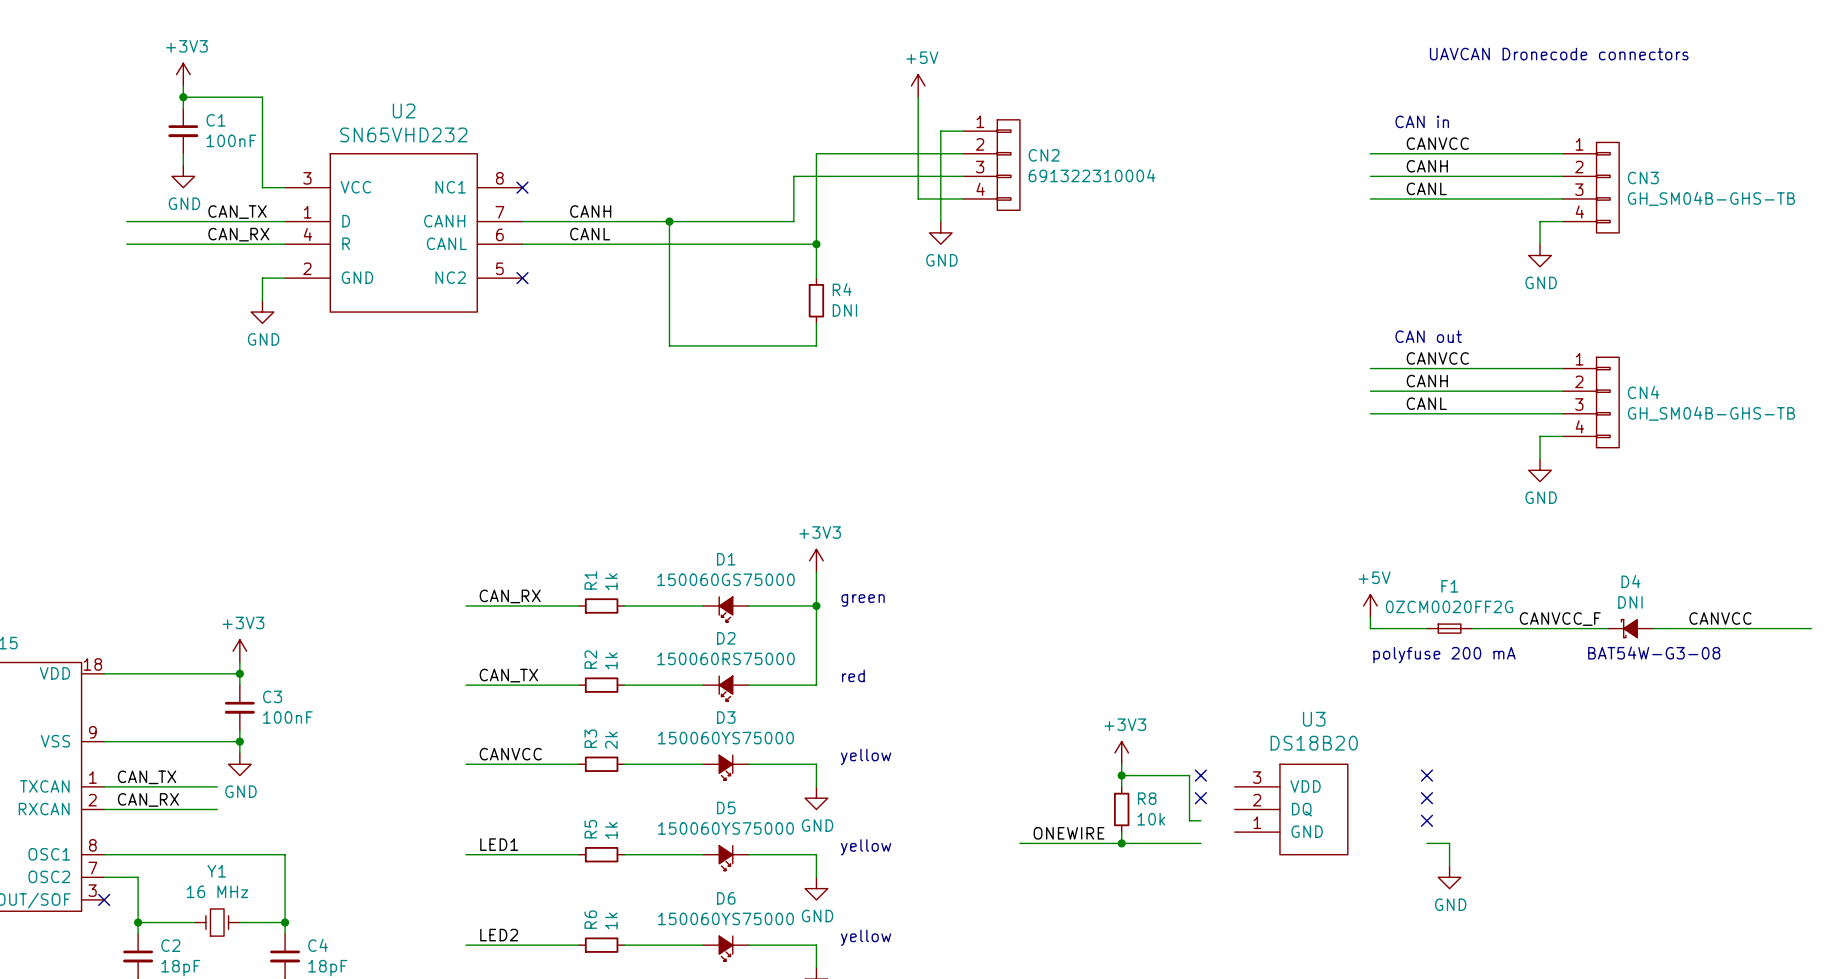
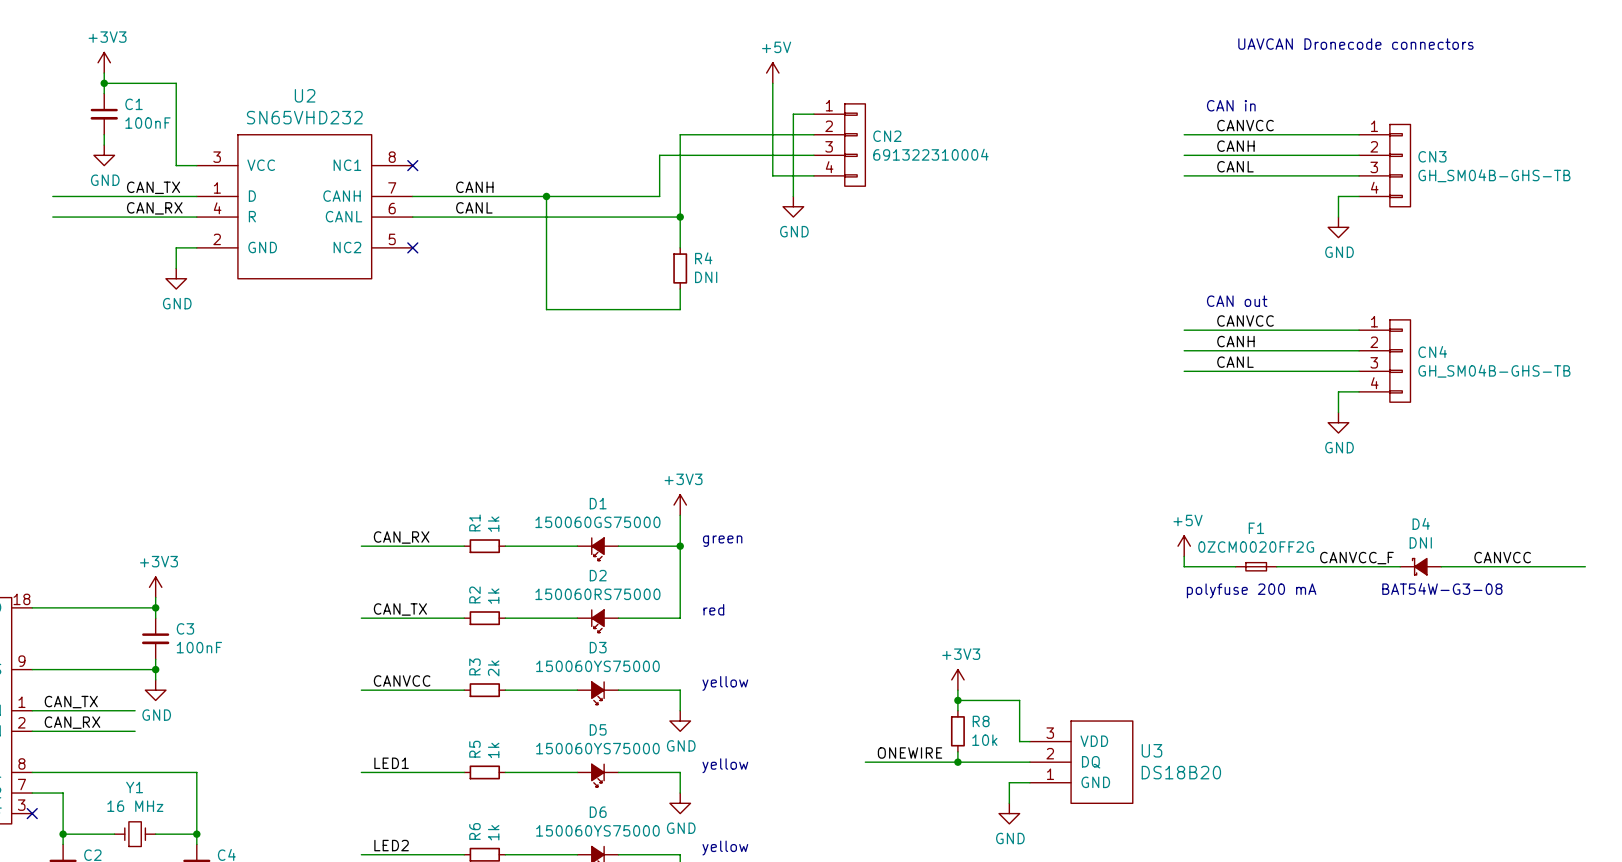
U3 name position: U3 (1314, 719) -> U3 (1151, 750)
U3 value position: DS18B20 (1314, 743) -> DS18B20 (1181, 772)
no-connect mark: (1200, 775) -> none
no-connect mark: (1426, 775) -> none
no-connect mark: (1200, 798) -> none
no-connect mark: (1426, 798) -> none
U3 position: (1291, 809) -> (1081, 762)
no-connect mark: (1426, 820) -> none
wire: (1426, 843) (1449, 843) (1449, 866) -> none
wire: none -> (1029, 782) (1009, 782) (1009, 803)
power symbol: GND (1449, 877) -> none
power symbol: none -> GND (1009, 813)

